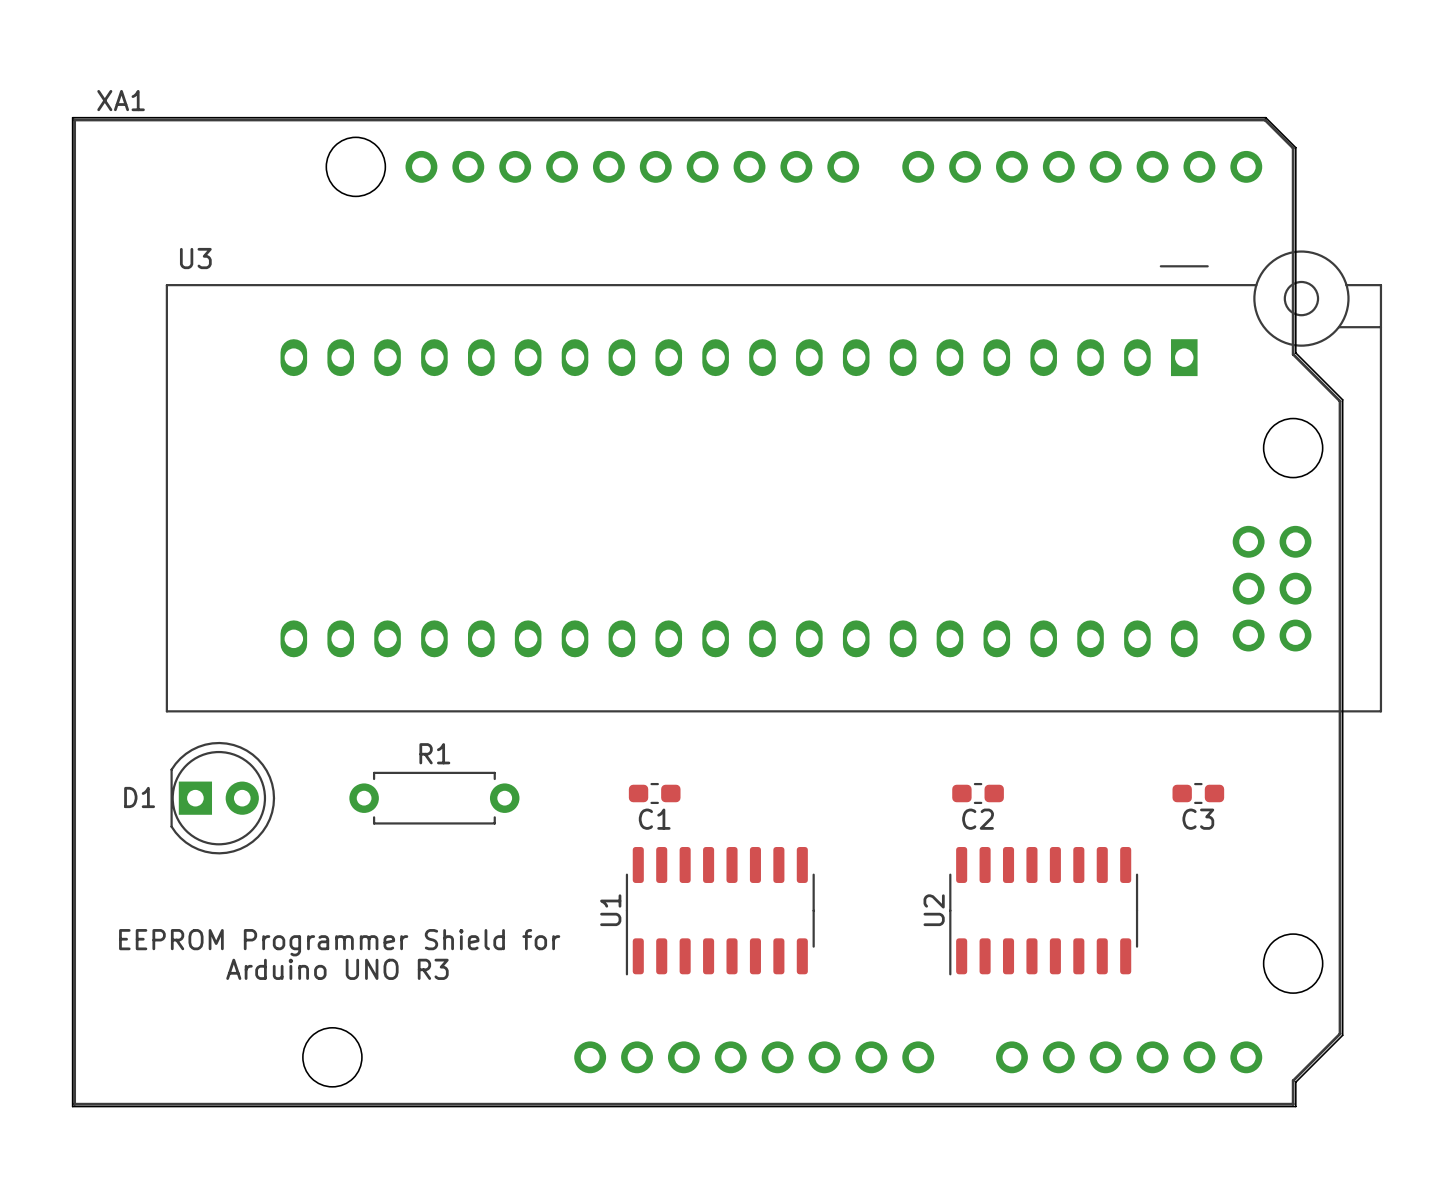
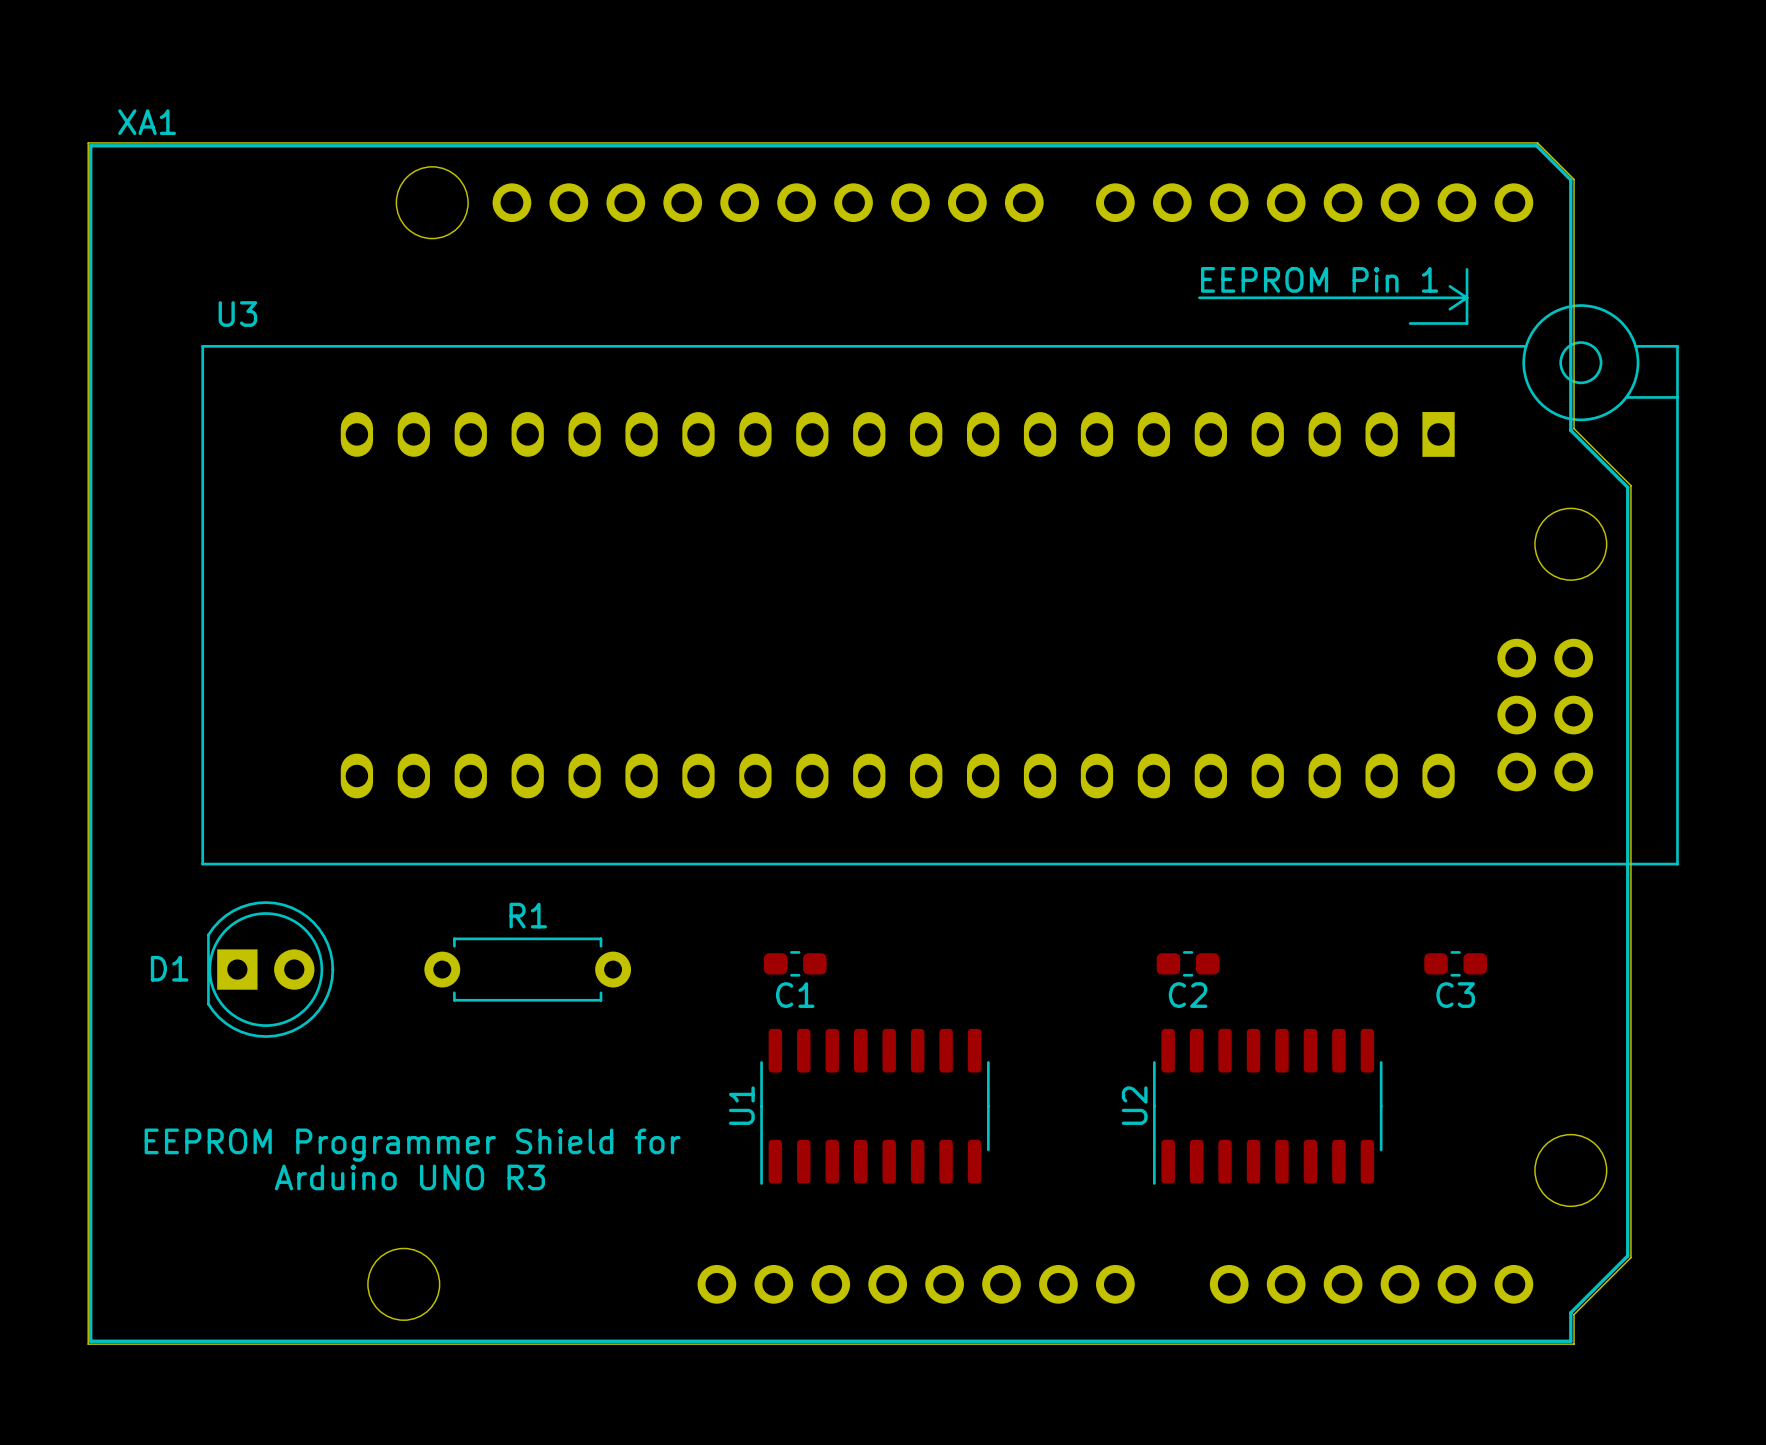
line: none -> (1467, 269) (1467, 323)
text: none -> EEPROM Pin 1 (1319, 279)
line: none -> (1449, 286) (1467, 297)
line: none -> (1199, 297) (1467, 297)
line: none -> (1467, 297) (1449, 309)

